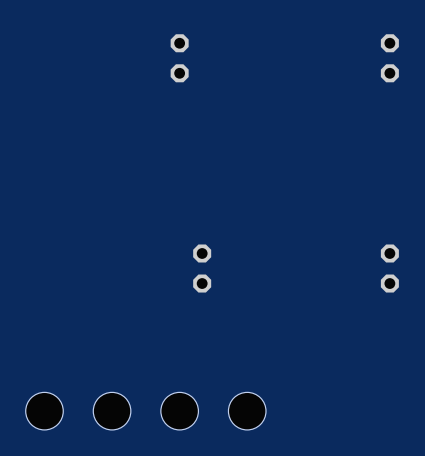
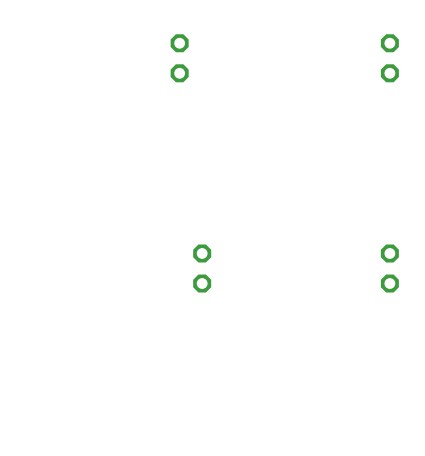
part: (44, 411) -> none
part: (112, 411) -> none
part: (179, 411) -> none
part: (247, 411) -> none

